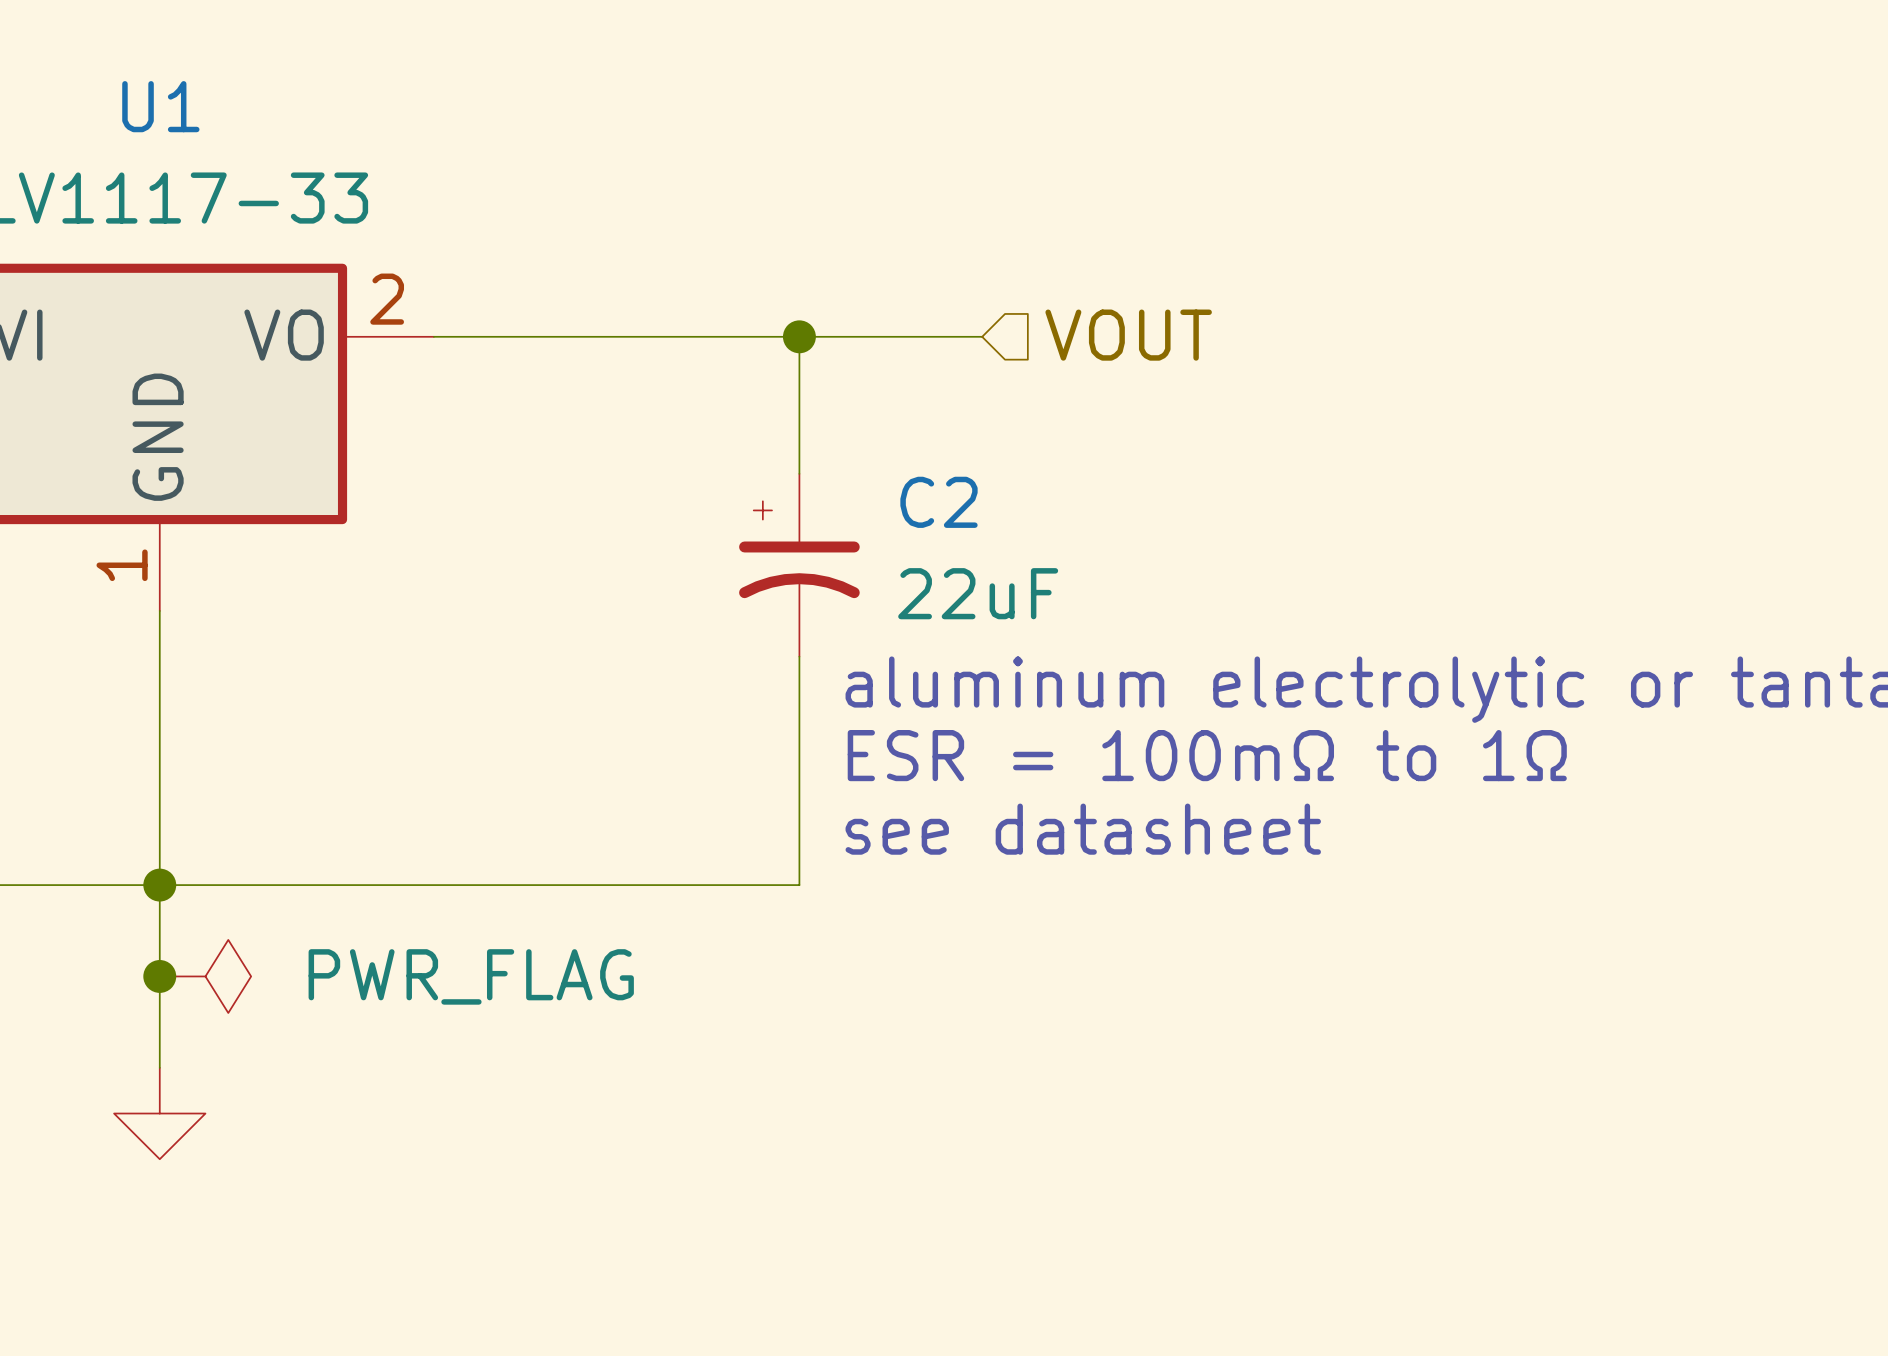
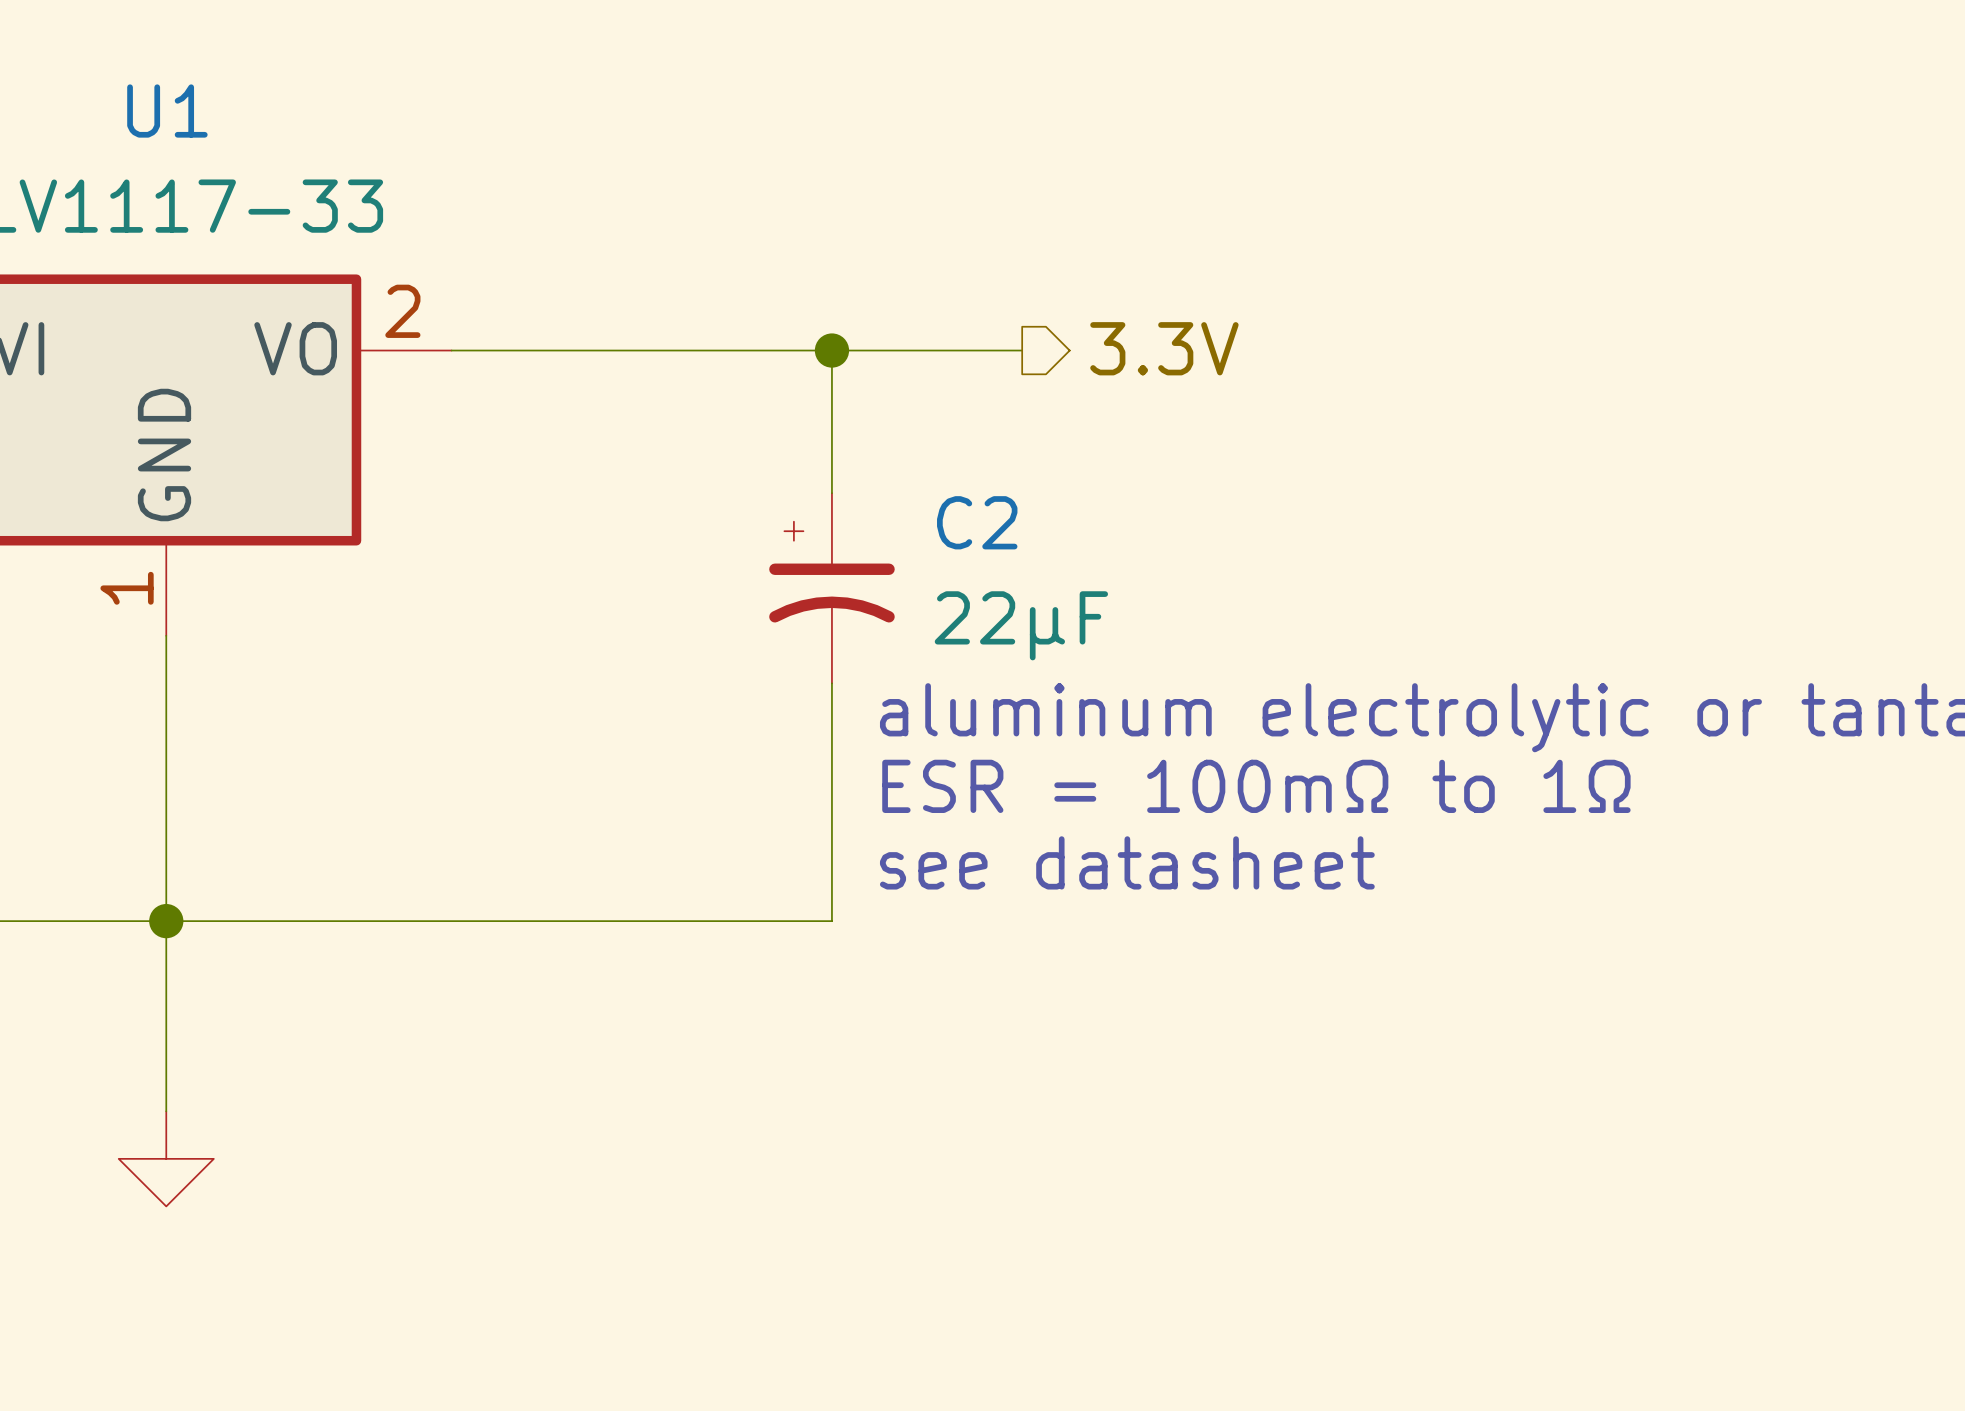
hierarchical label shape: input (1128, 335) -> output (1164, 348)
hierarchical label: VOUT (1128, 335) -> 3.3V (1164, 348)
C2 value: 22uF (978, 593) -> 22µF (1021, 625)
junction: (159, 976) -> none
power symbol: PWR_FLAG (205, 976) -> none

